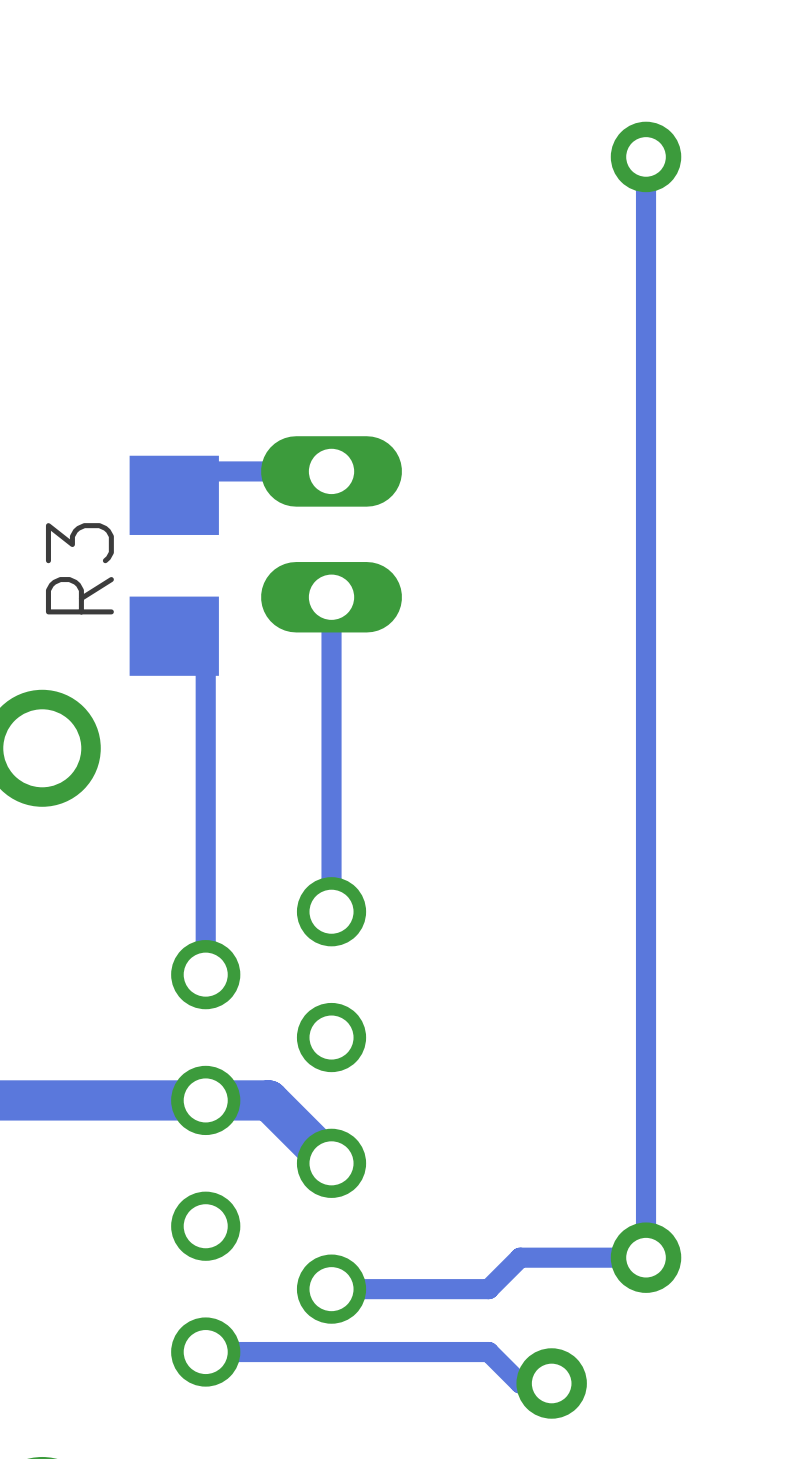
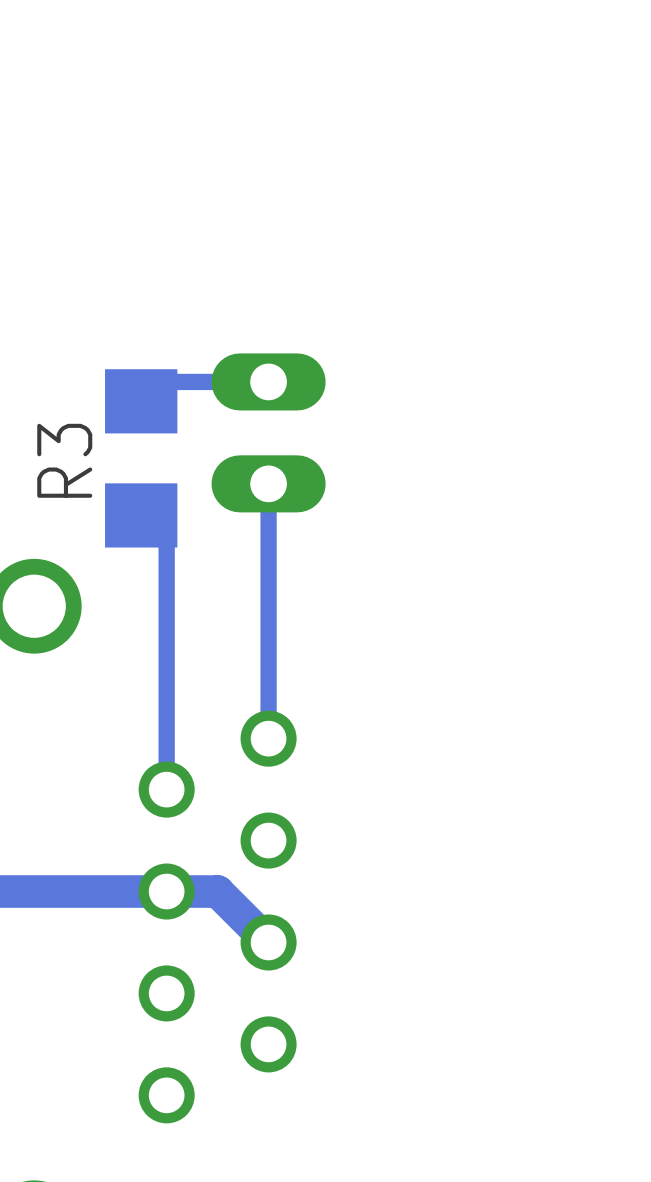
track: (646, 156) (646, 1257) (520, 1257) (488, 1289) (331, 1289) -> none
via: (646, 156) -> none
via: (646, 1257) -> none
track: (205, 1352) (488, 1352) (520, 1383) (551, 1383) -> none
via: (551, 1383) -> none

